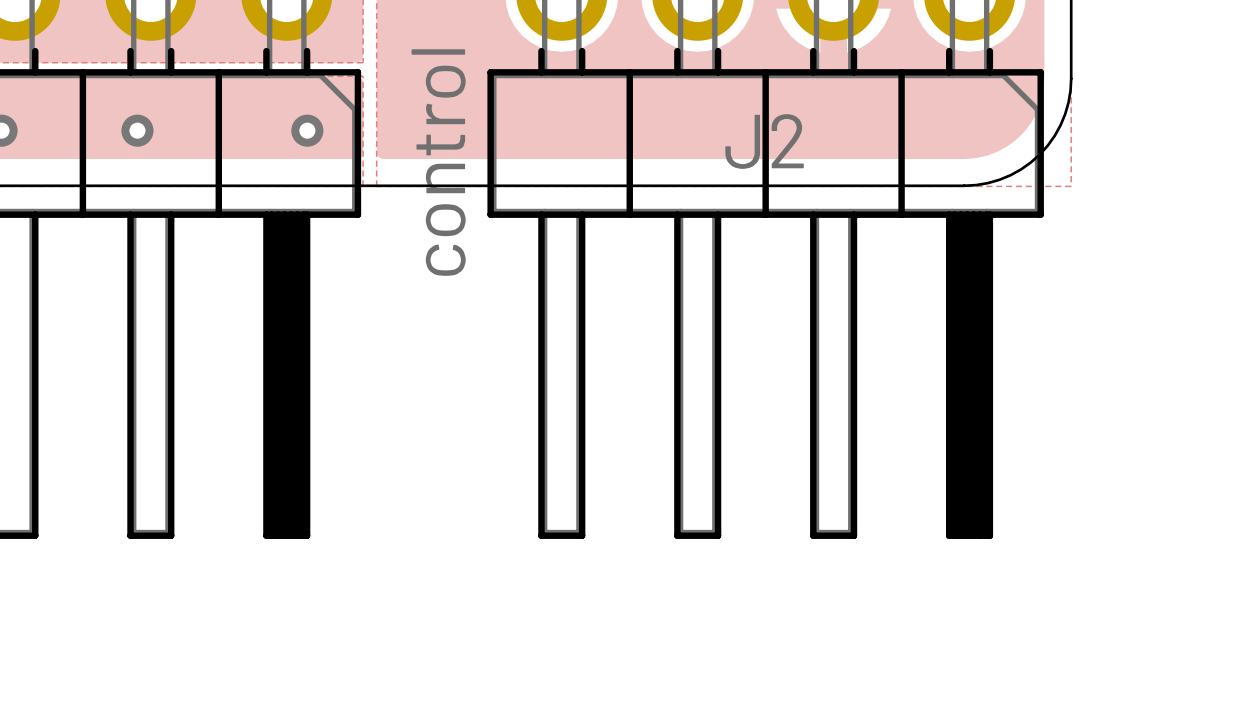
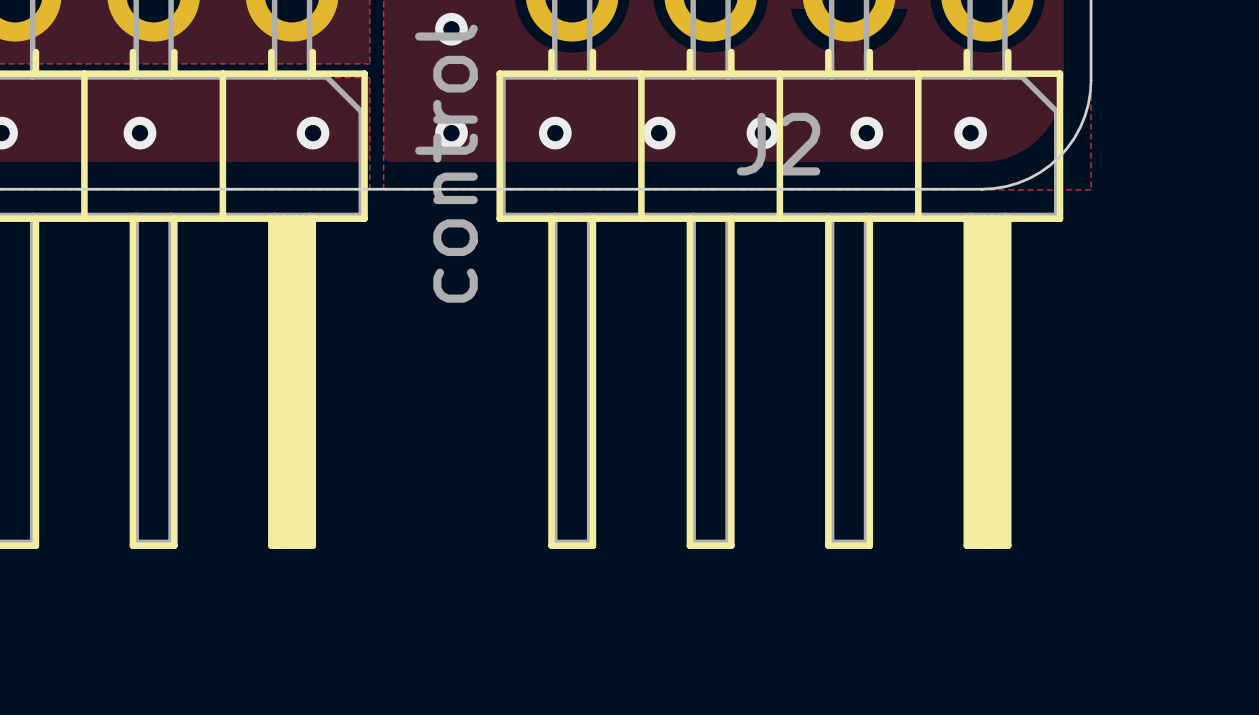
via: none -> (451, 29)
via: none -> (451, 133)
via: none -> (555, 133)
via: none -> (659, 133)
via: none -> (762, 133)
via: none -> (866, 133)
via: none -> (970, 133)

